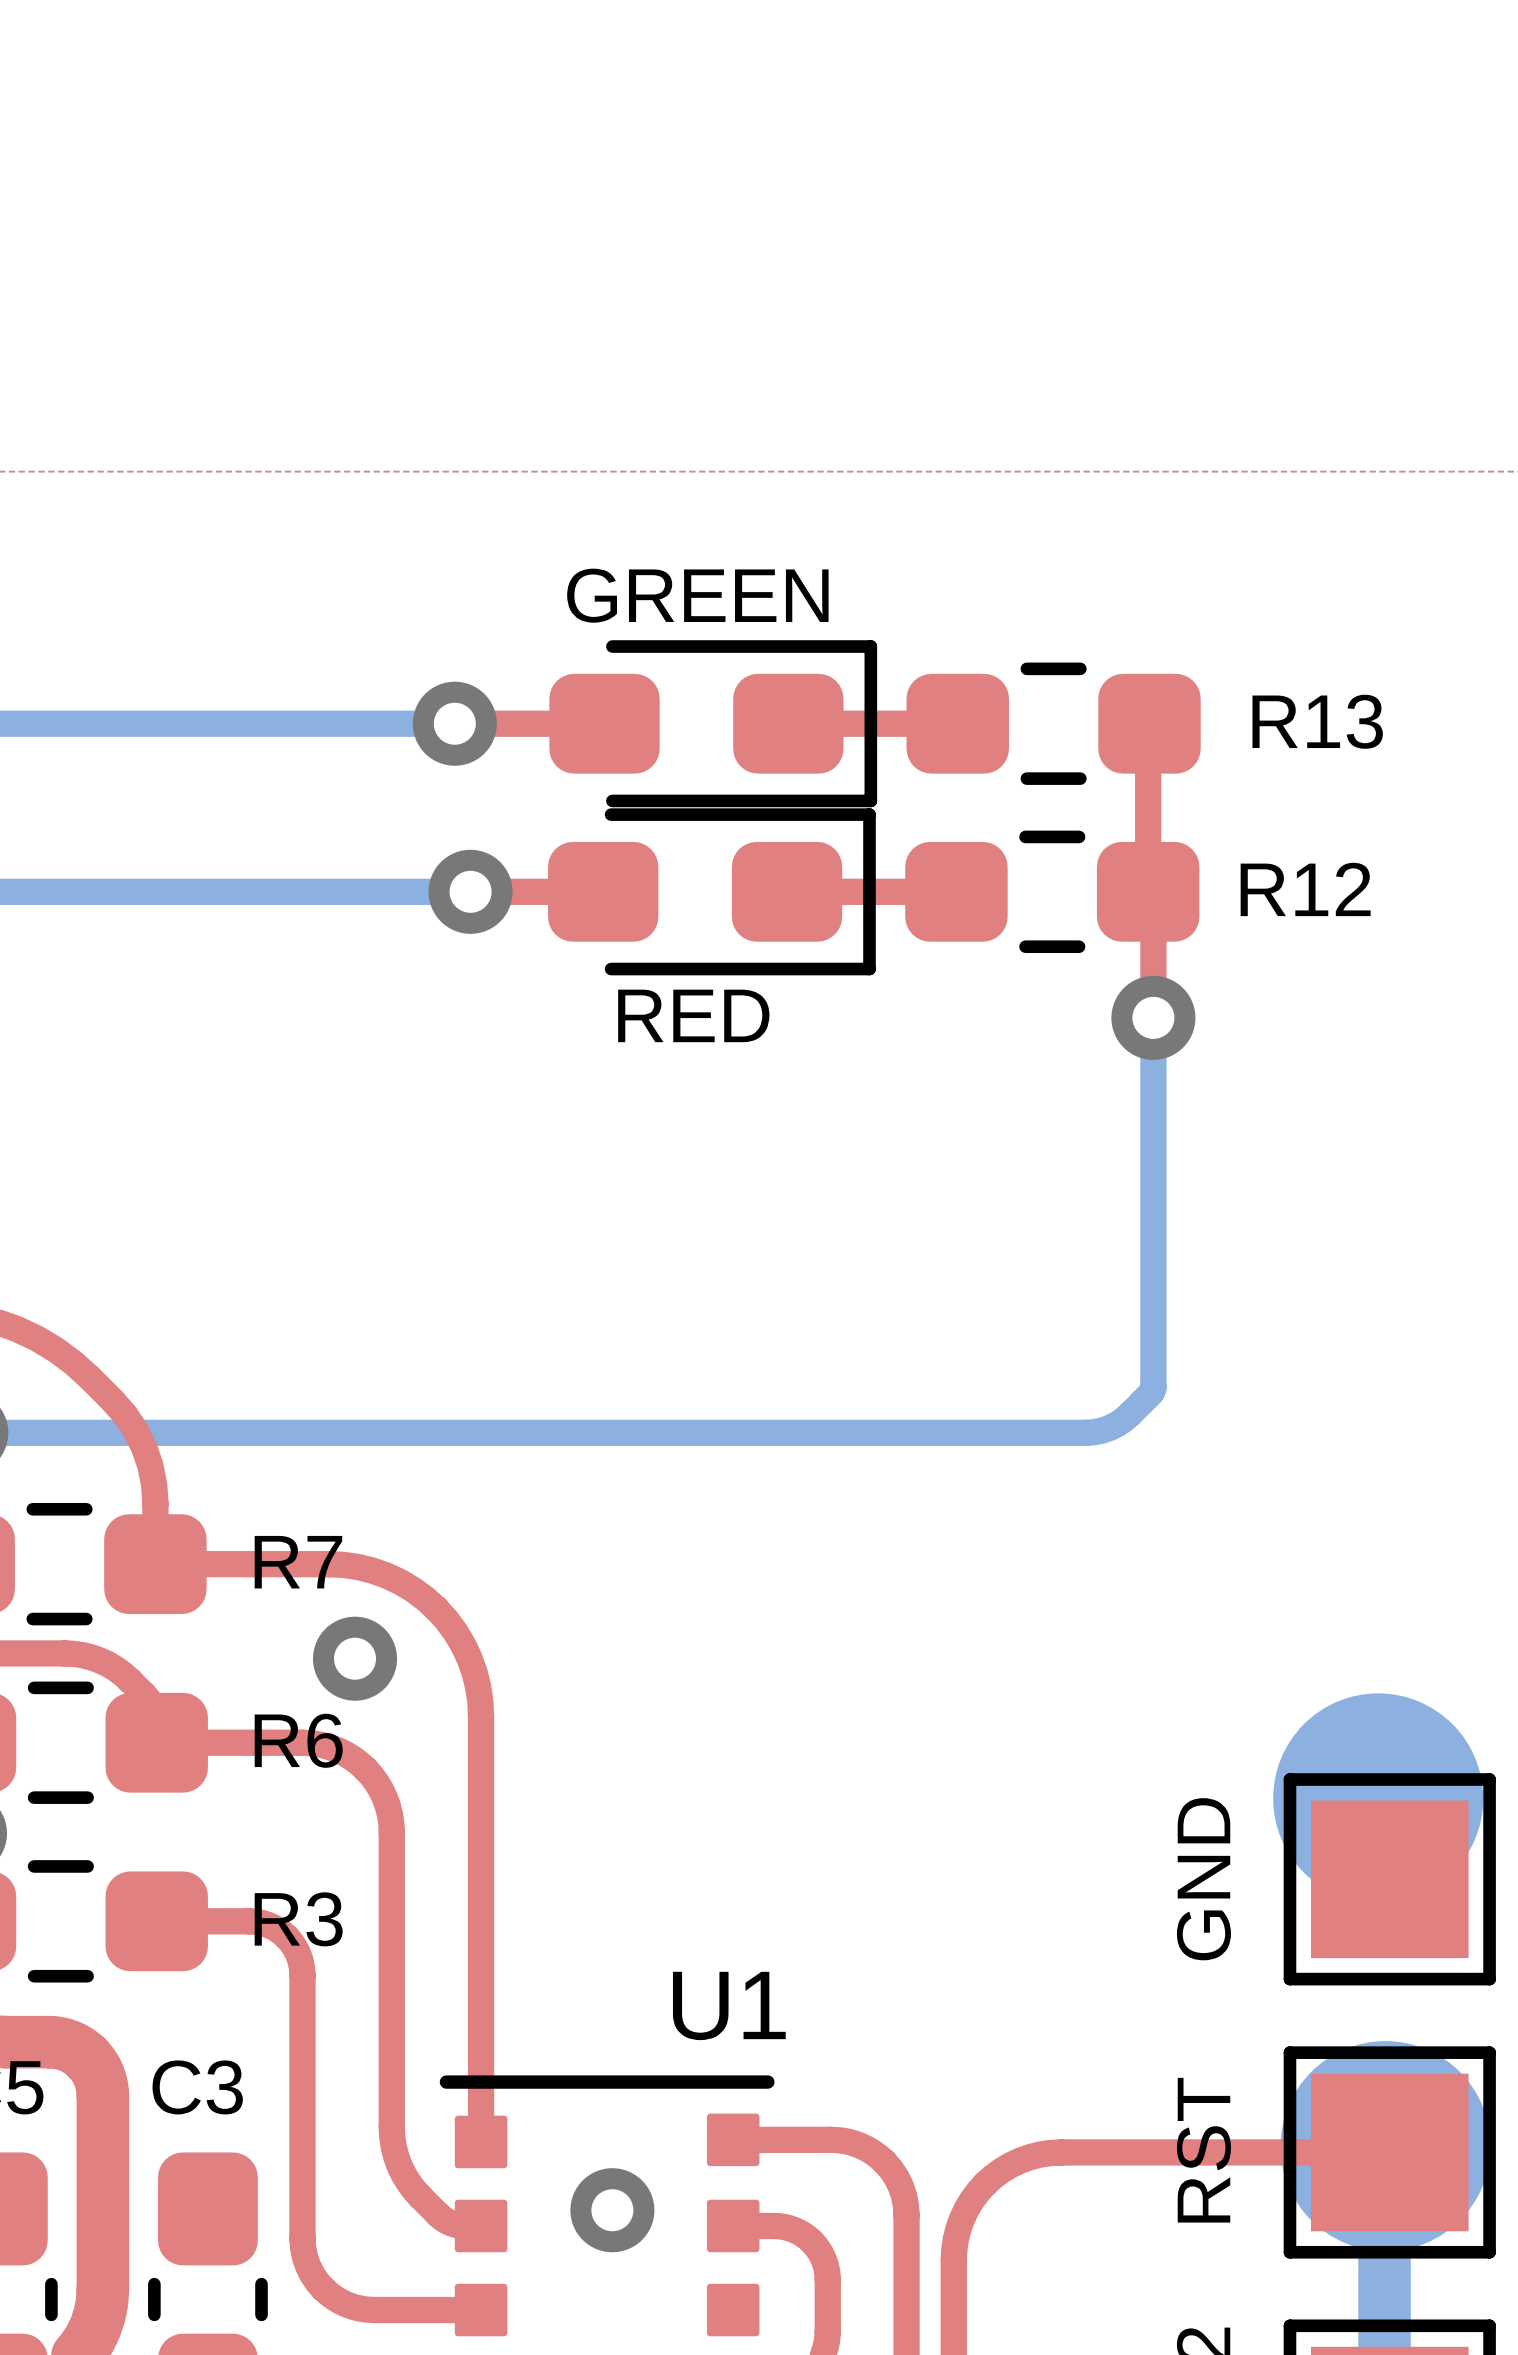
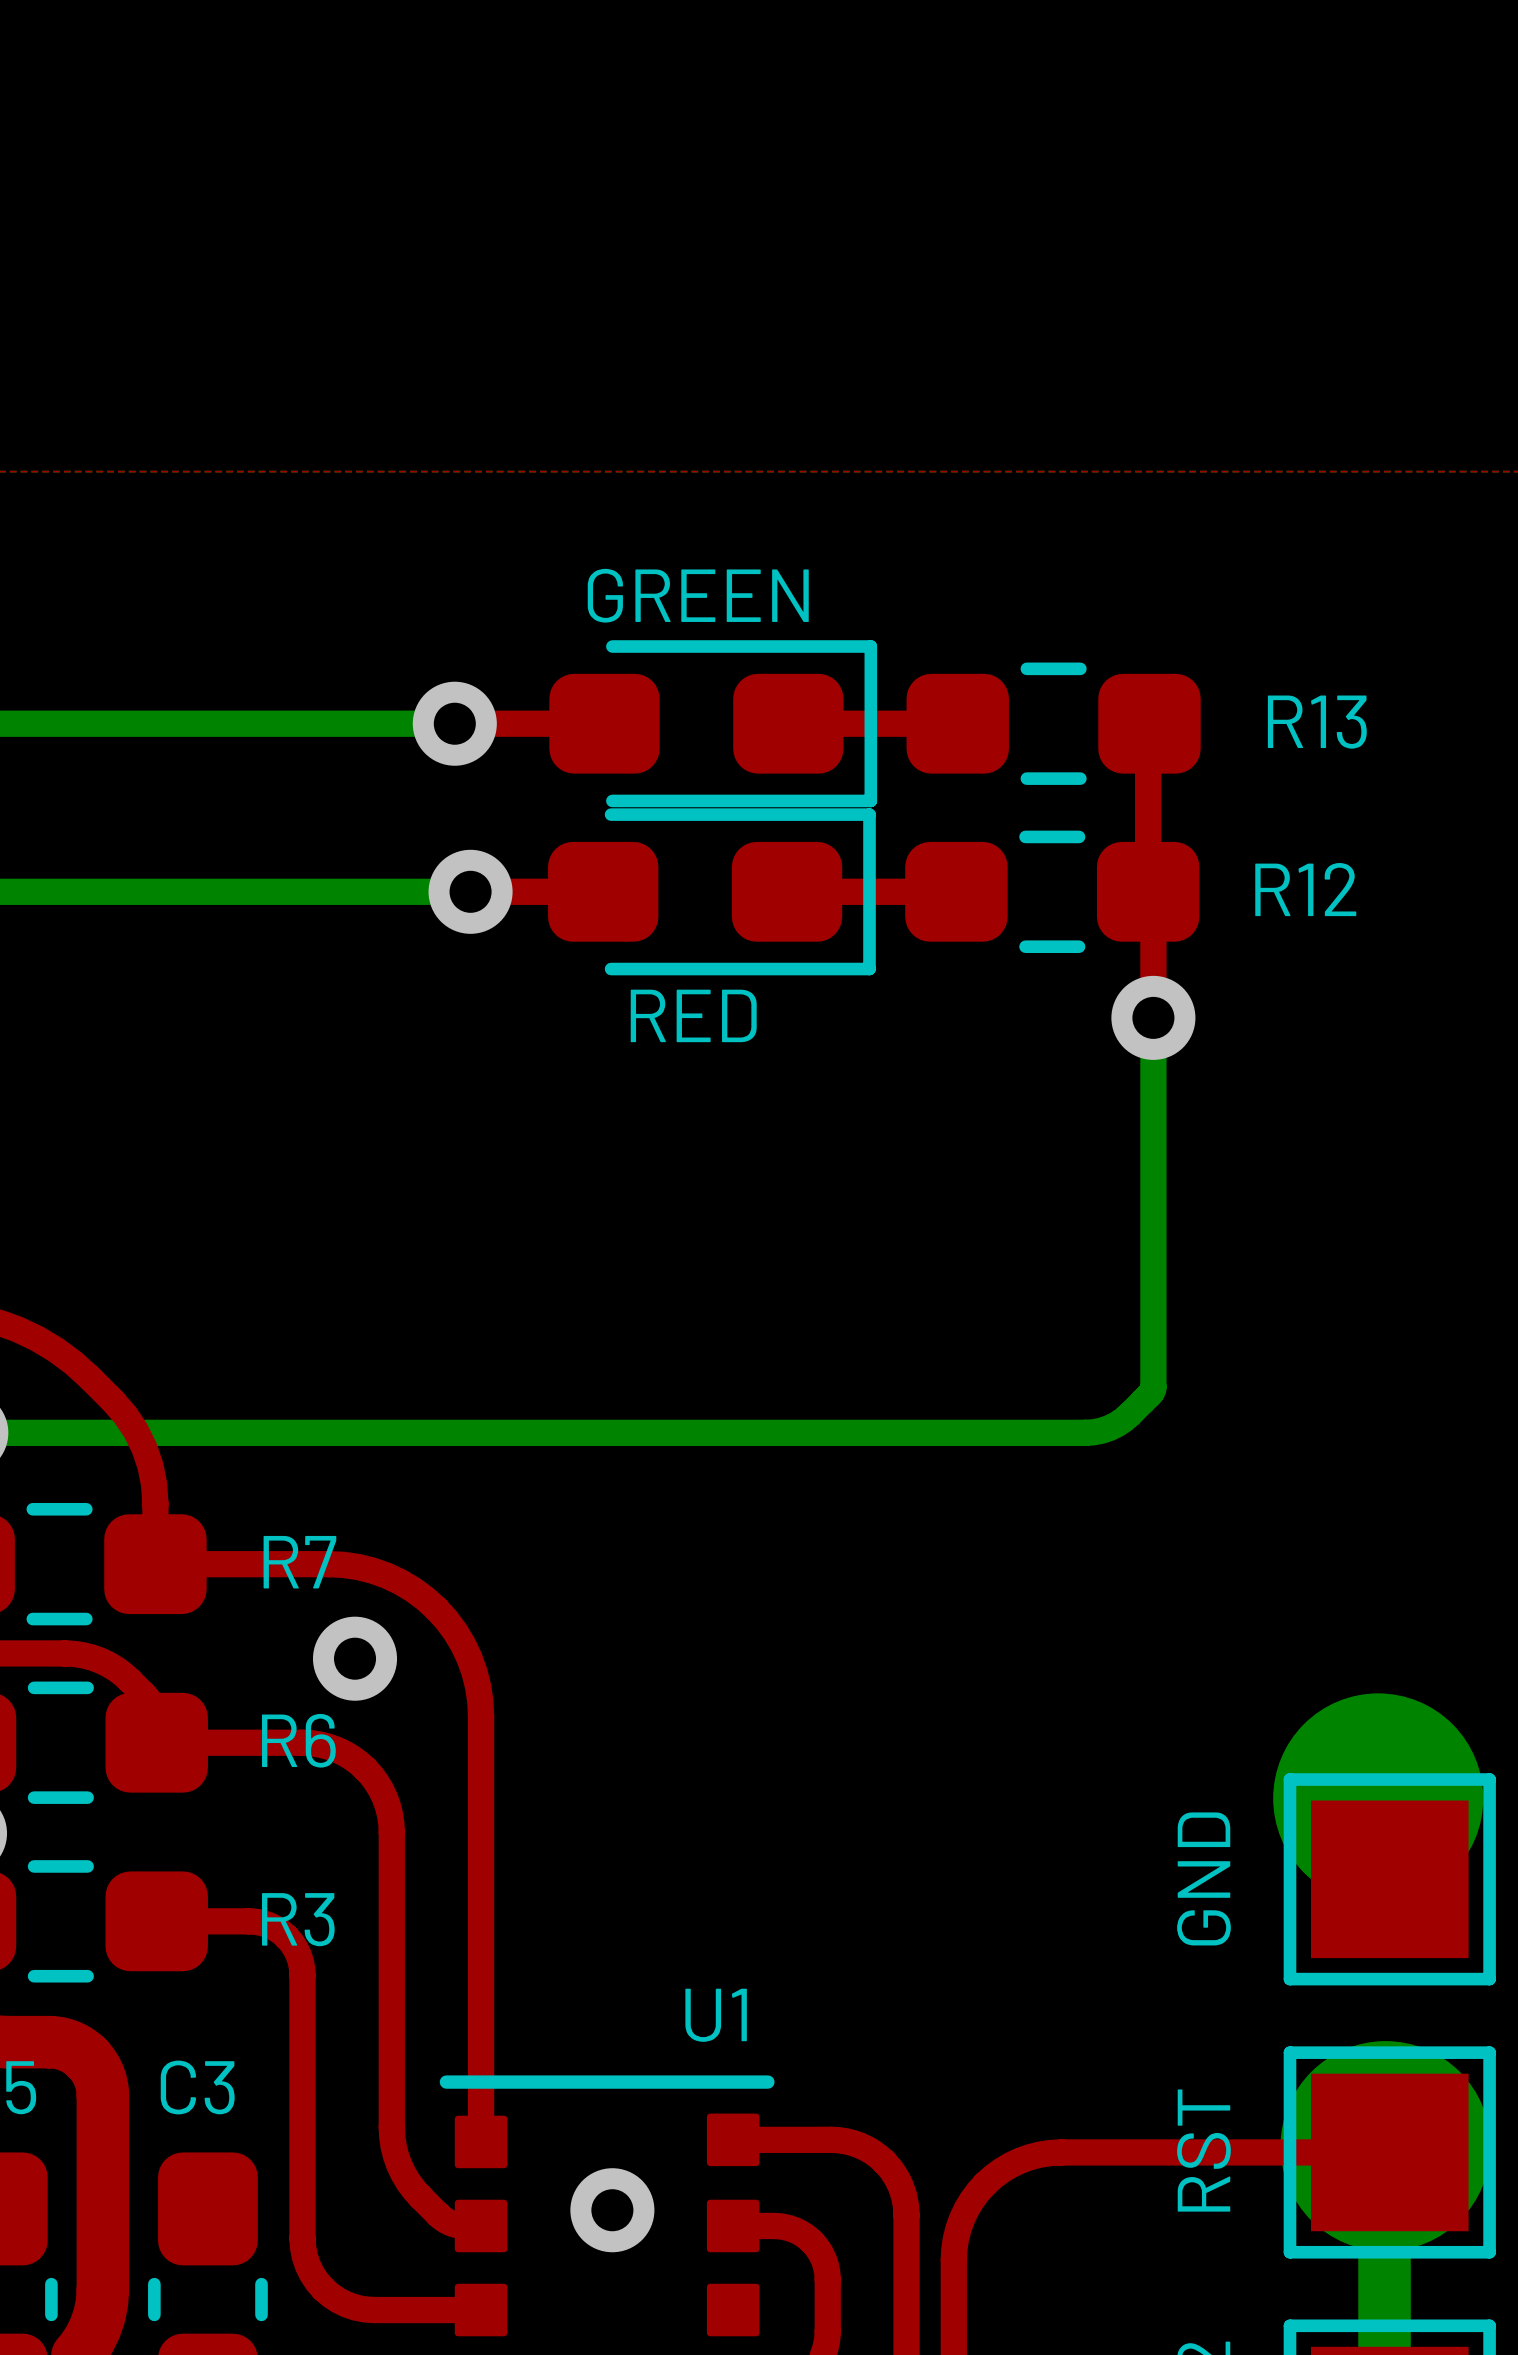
U1 name position: U1 (729, 2005) -> U1 (716, 2015)

